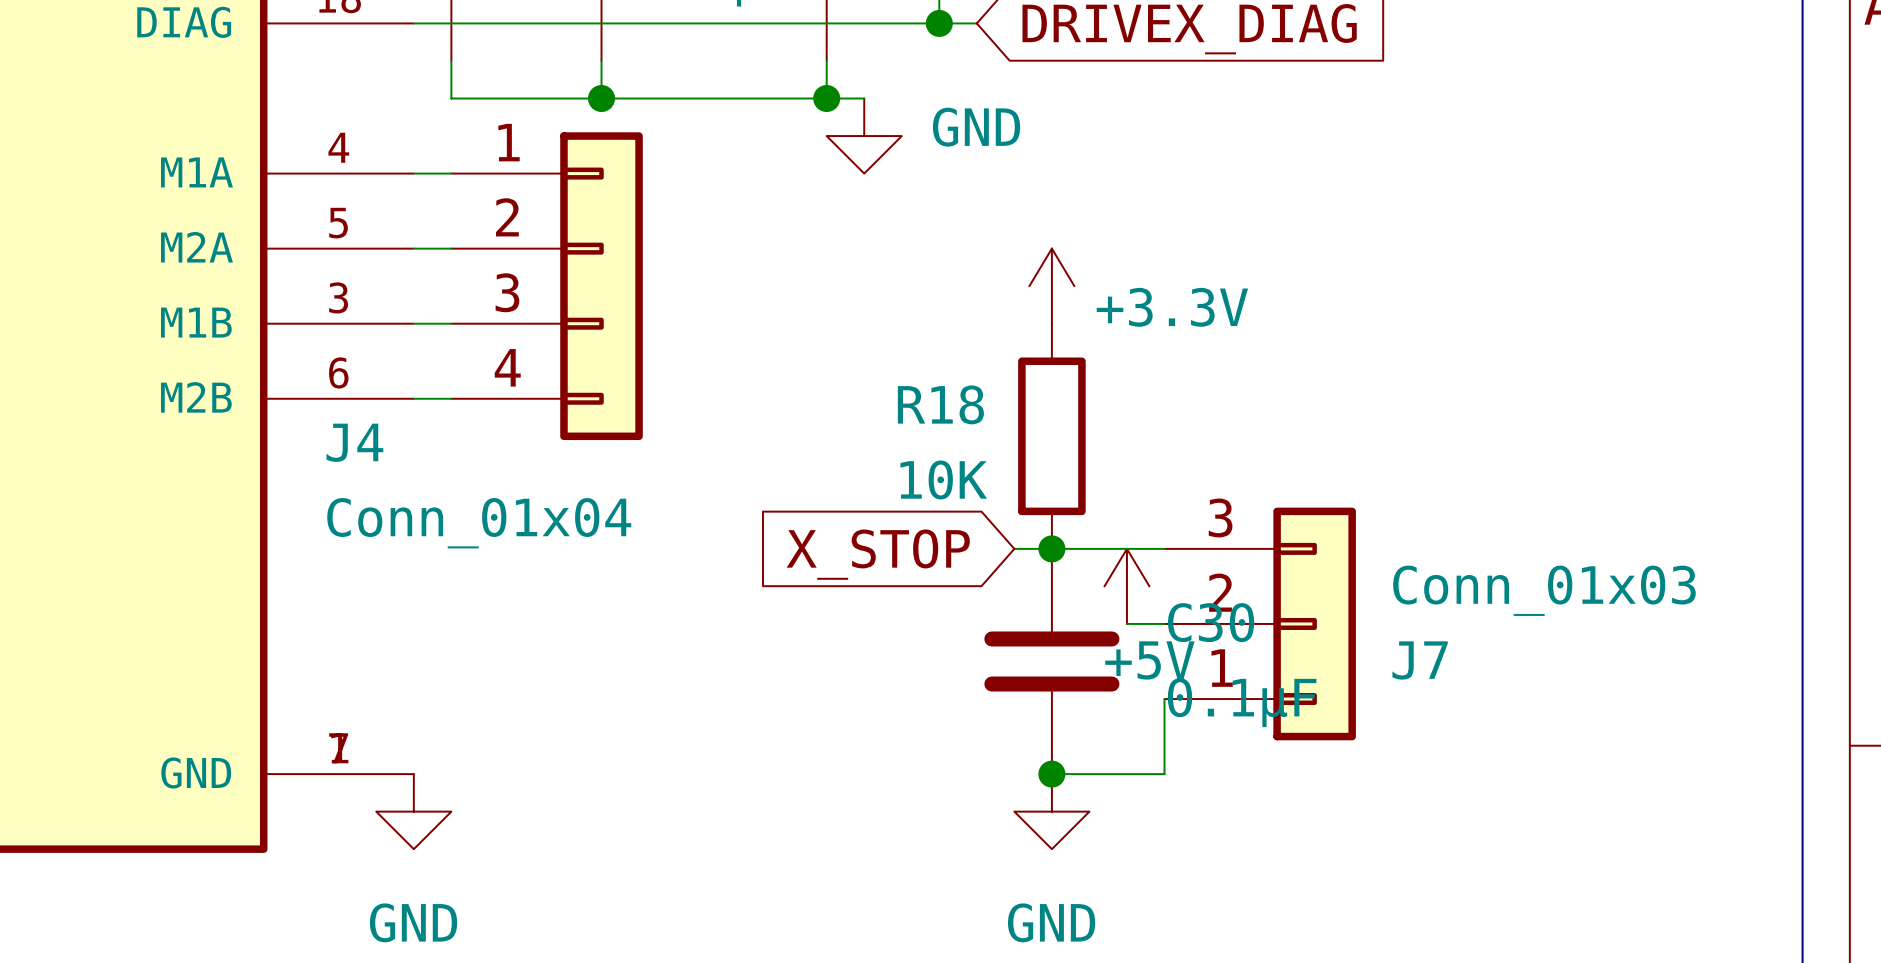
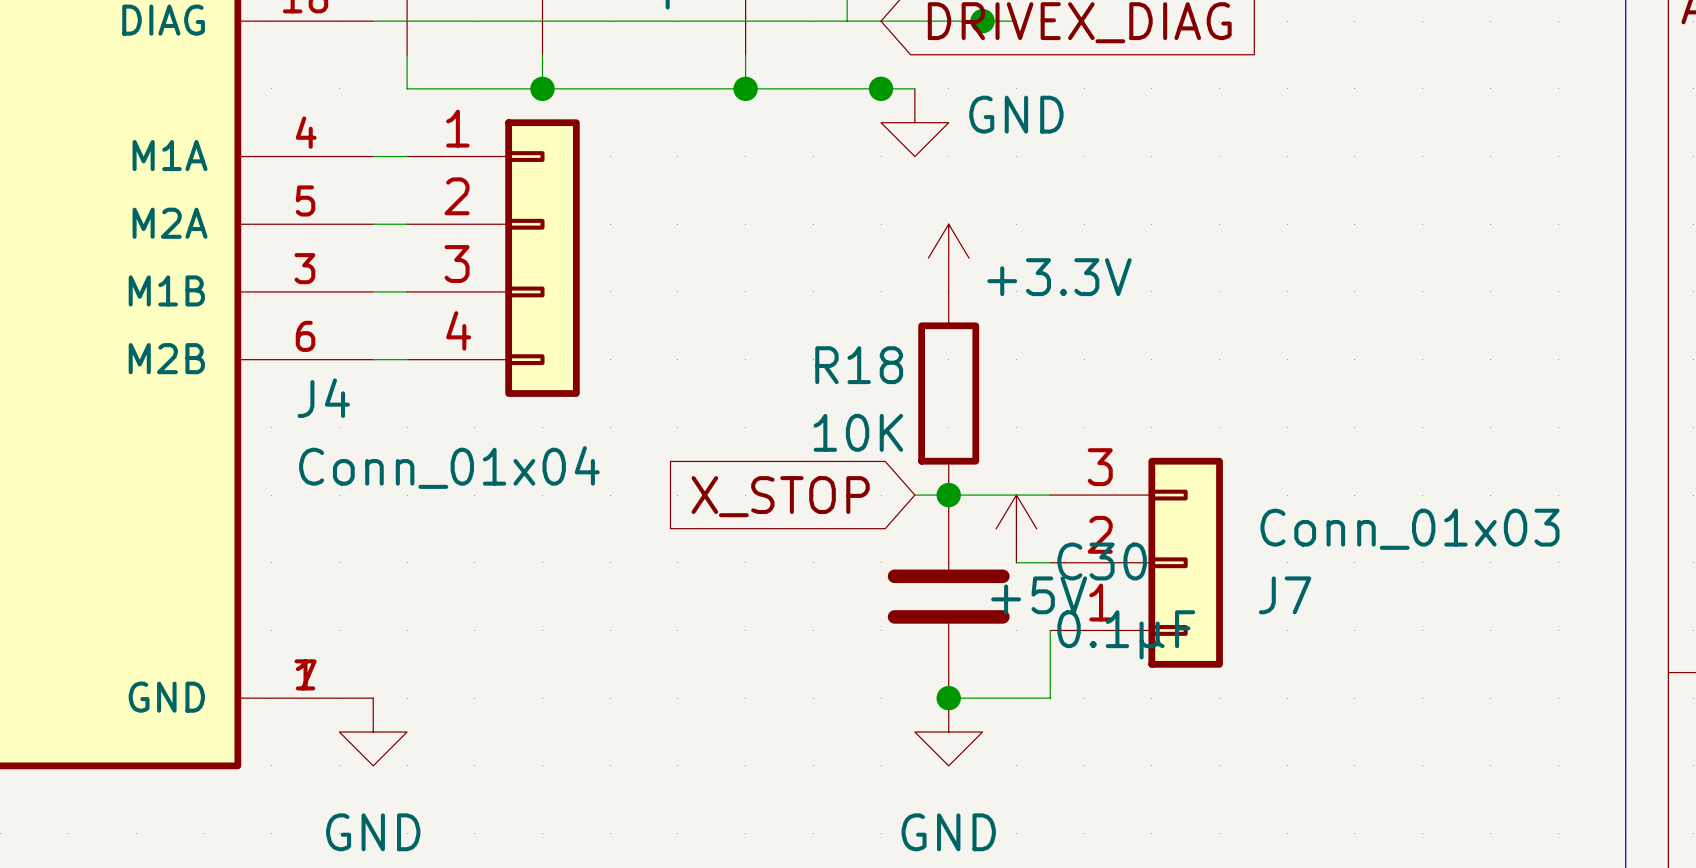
junction: (939, 23) -> none
wire: none -> (881, 21) (1016, 21)
junction: none -> (982, 21)
wire: none -> (779, 88) (914, 88)
junction: none -> (881, 88)
power symbol position: GND (864, 136) -> GND (914, 122)

